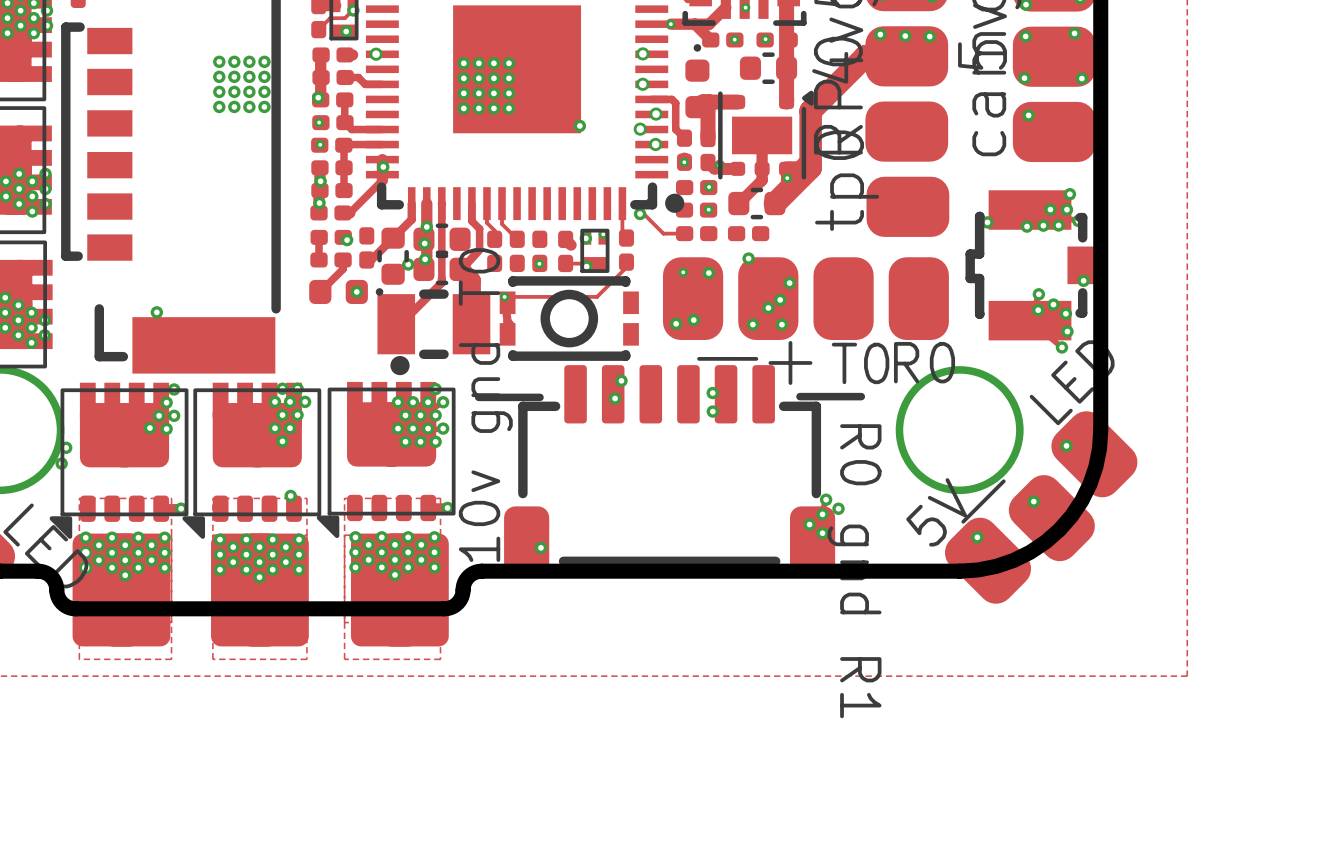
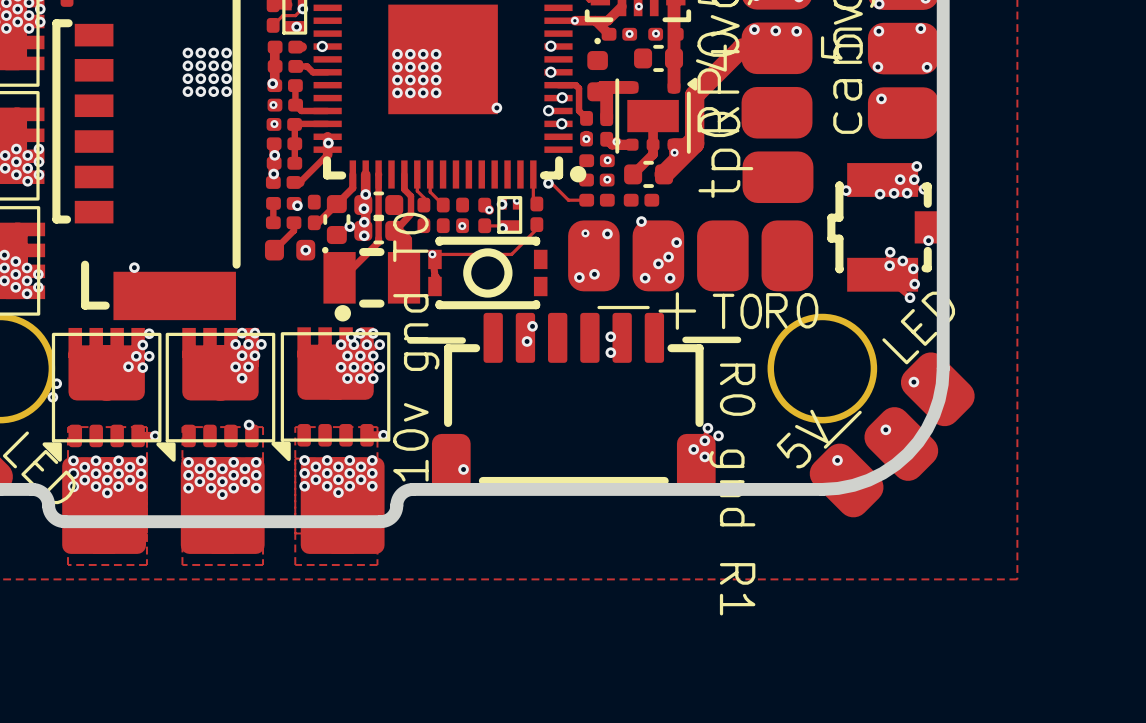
via: none -> (489, 210)
via: none -> (364, 235)
via: none -> (360, 333)
via: none -> (351, 337)

